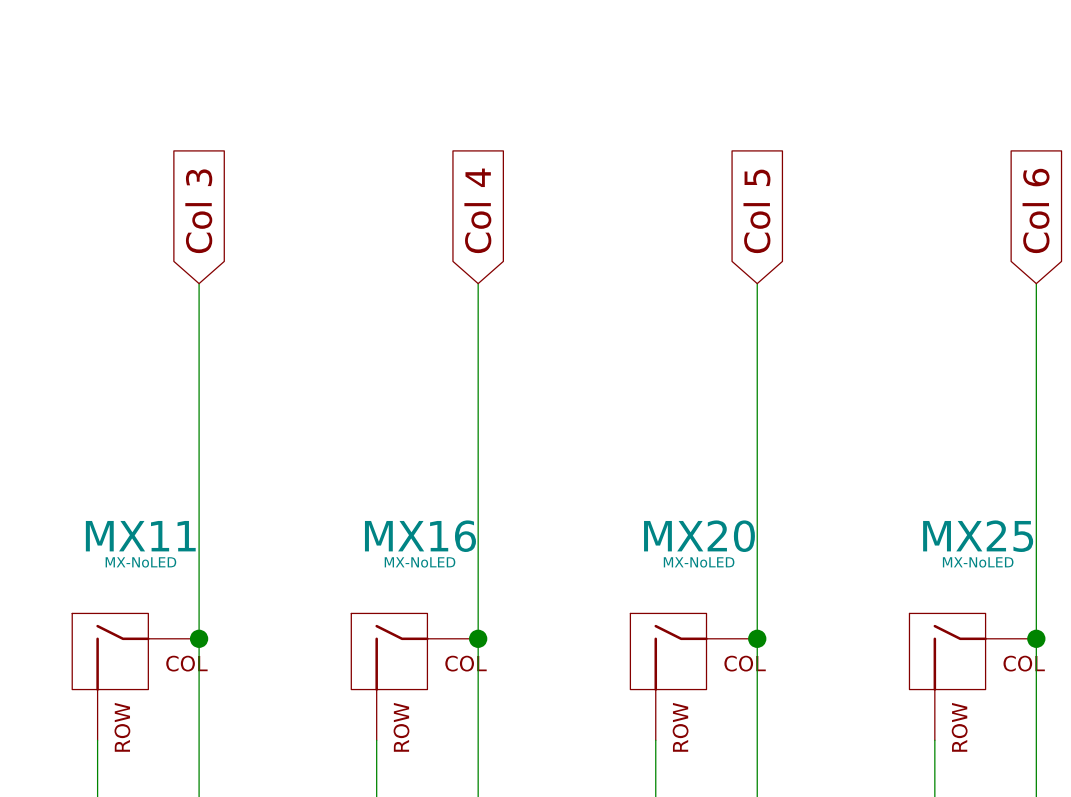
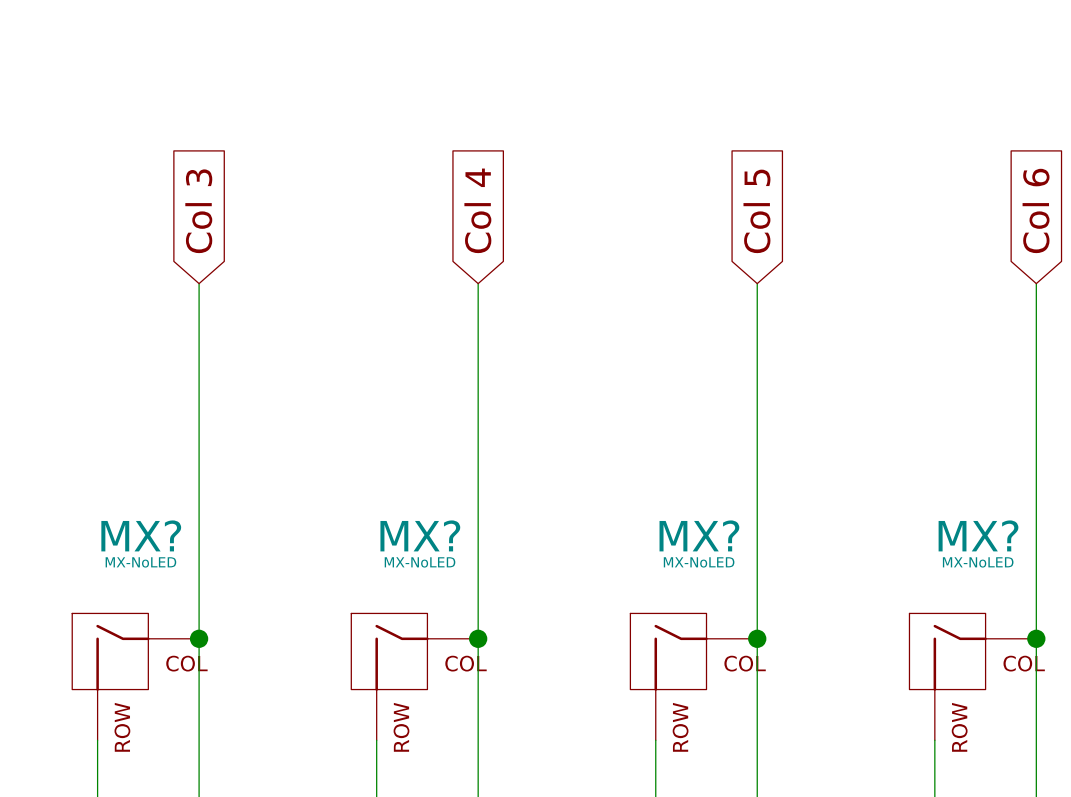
MX11 name: MX11 (140, 536) -> MX? (141, 535)
MX16 name: MX16 (420, 536) -> MX? (420, 535)
MX20 name: MX20 (699, 536) -> MX? (699, 535)
MX25 name: MX25 (978, 536) -> MX? (978, 535)

